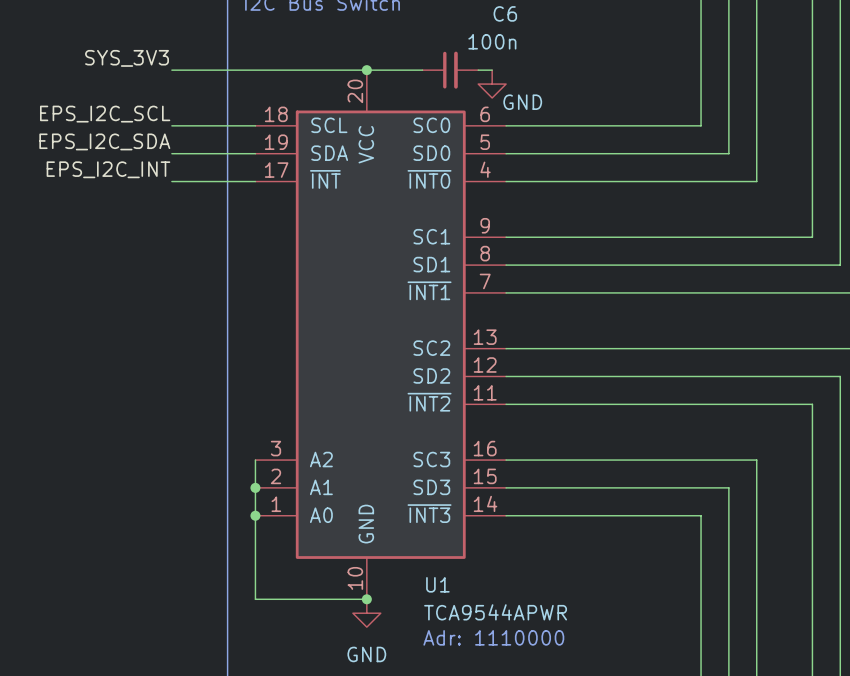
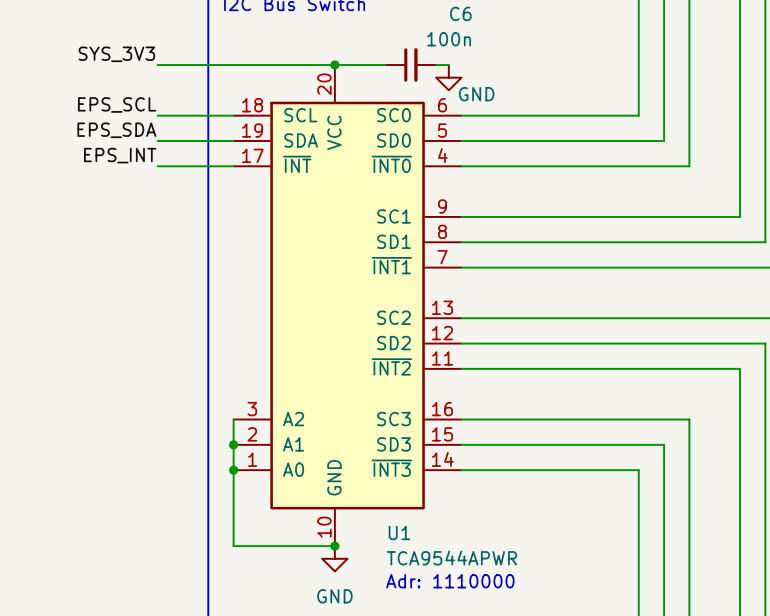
label: EPS_I2C_SCL (105, 114) -> EPS_SCL (117, 104)
label: EPS_I2C_SDA (104, 141) -> EPS_SDA (116, 130)
label: EPS_I2C_INT (108, 169) -> EPS_INT (120, 155)

